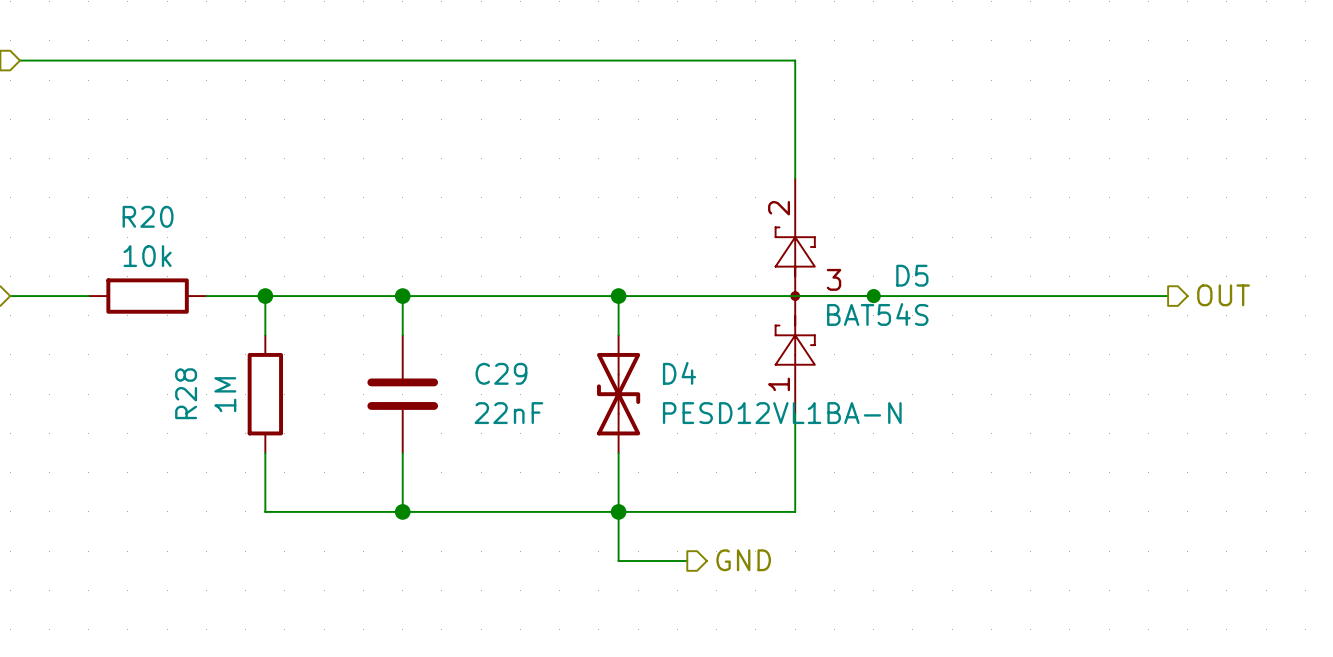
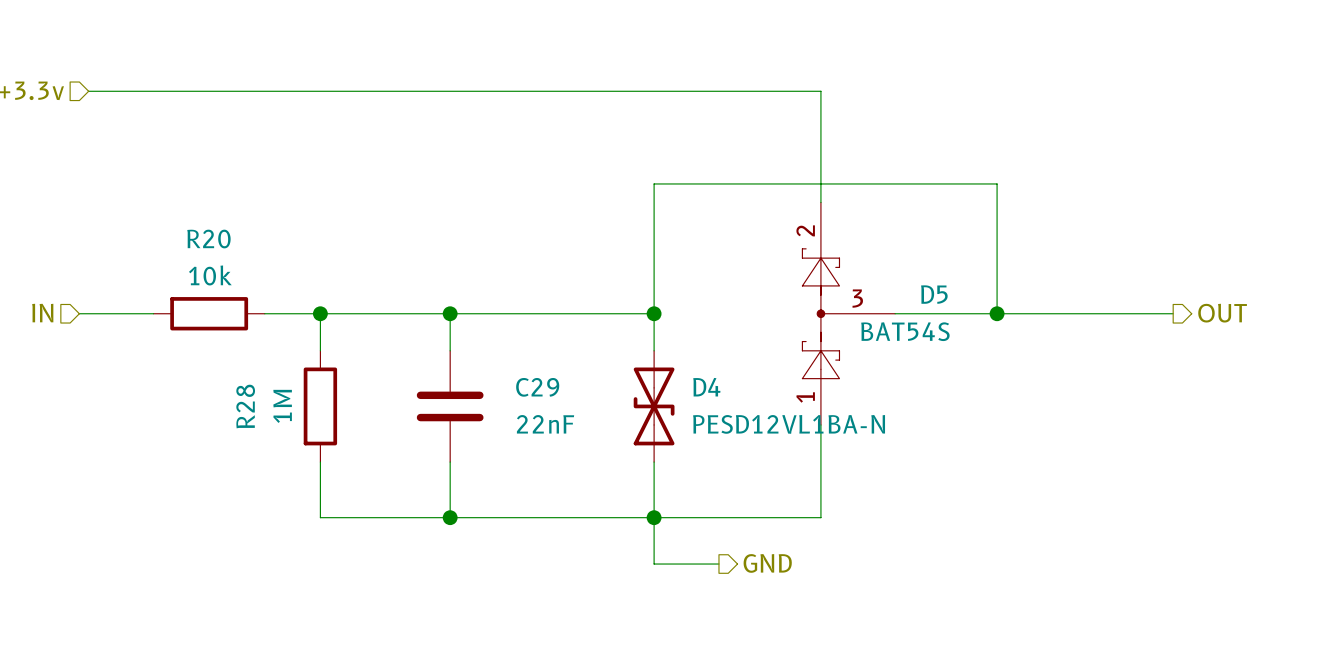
wire: (618, 296) (873, 296) -> (654, 313) (654, 183) (997, 183) (997, 313)
junction: (873, 296) -> none
junction: none -> (997, 313)

